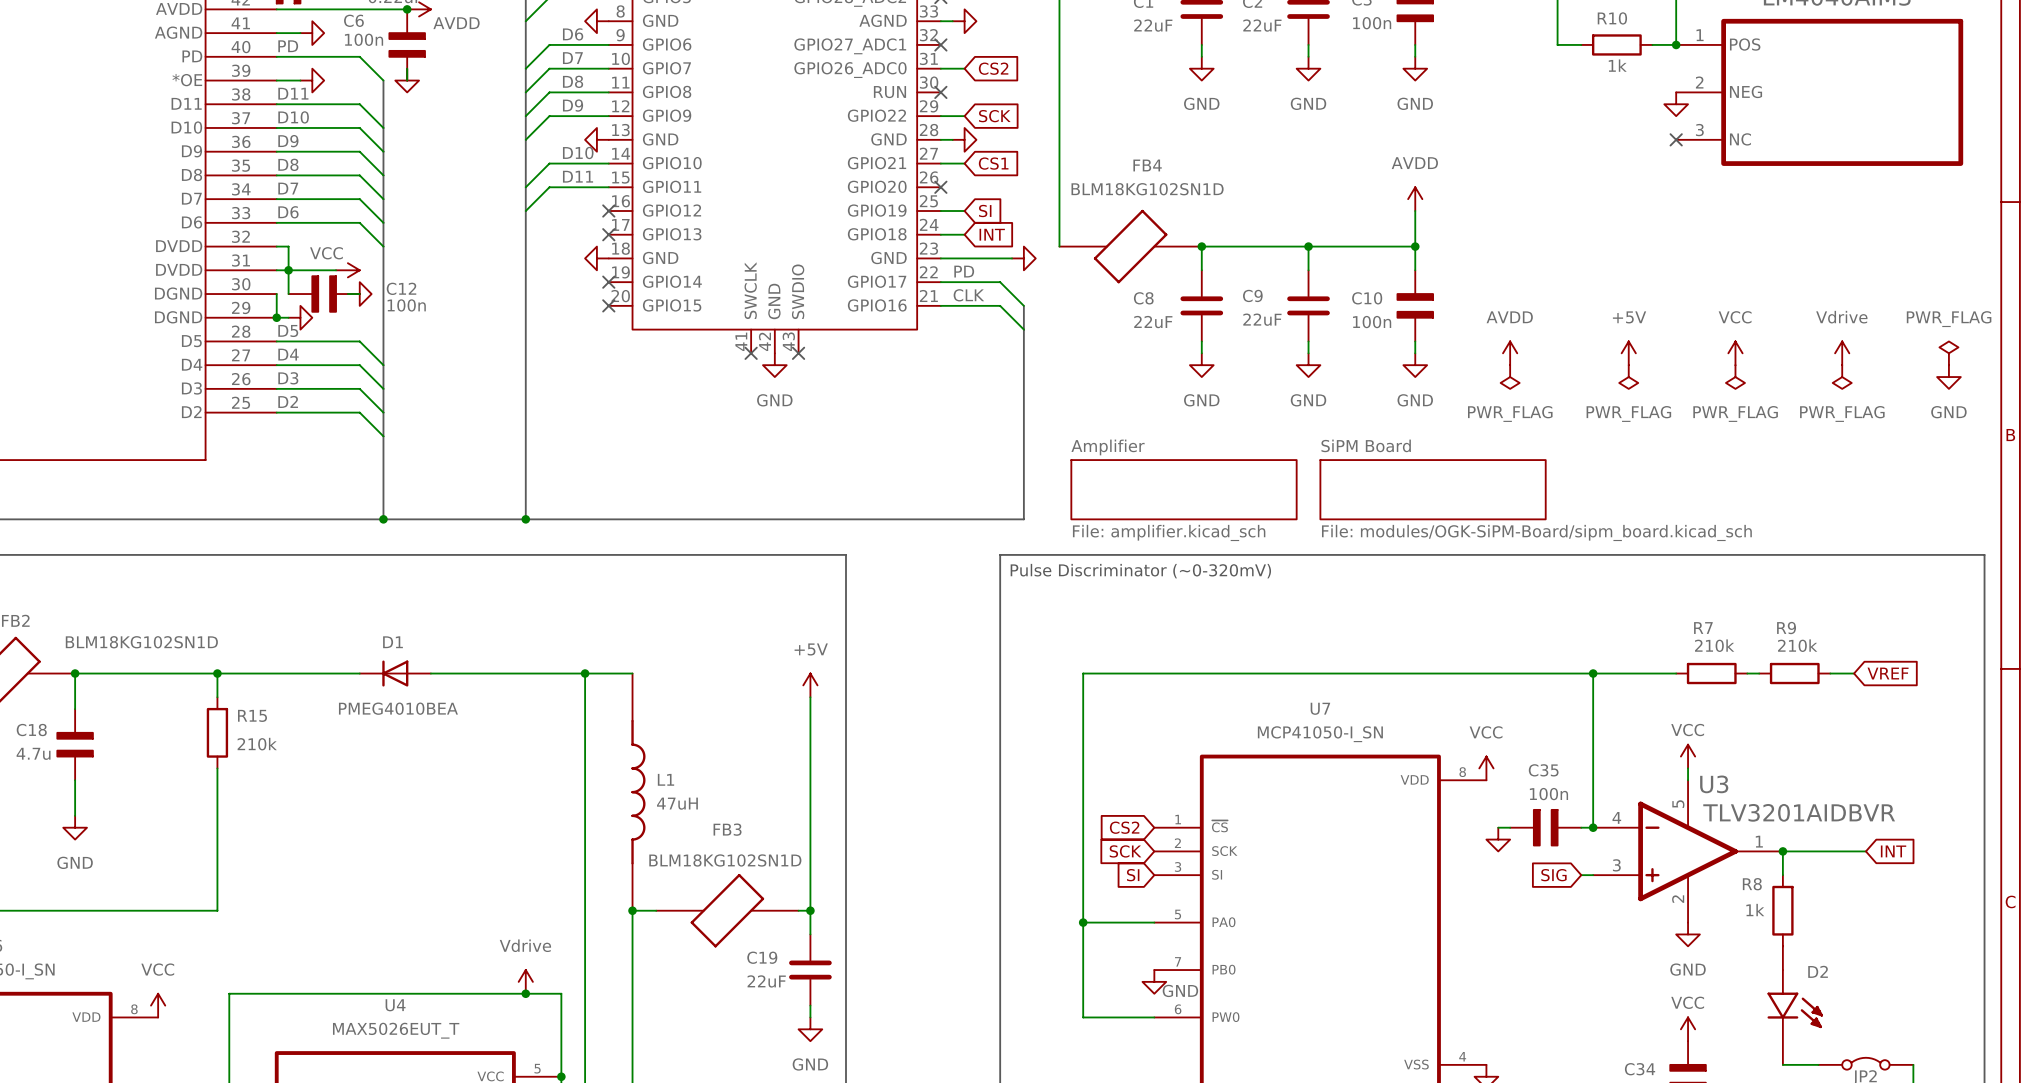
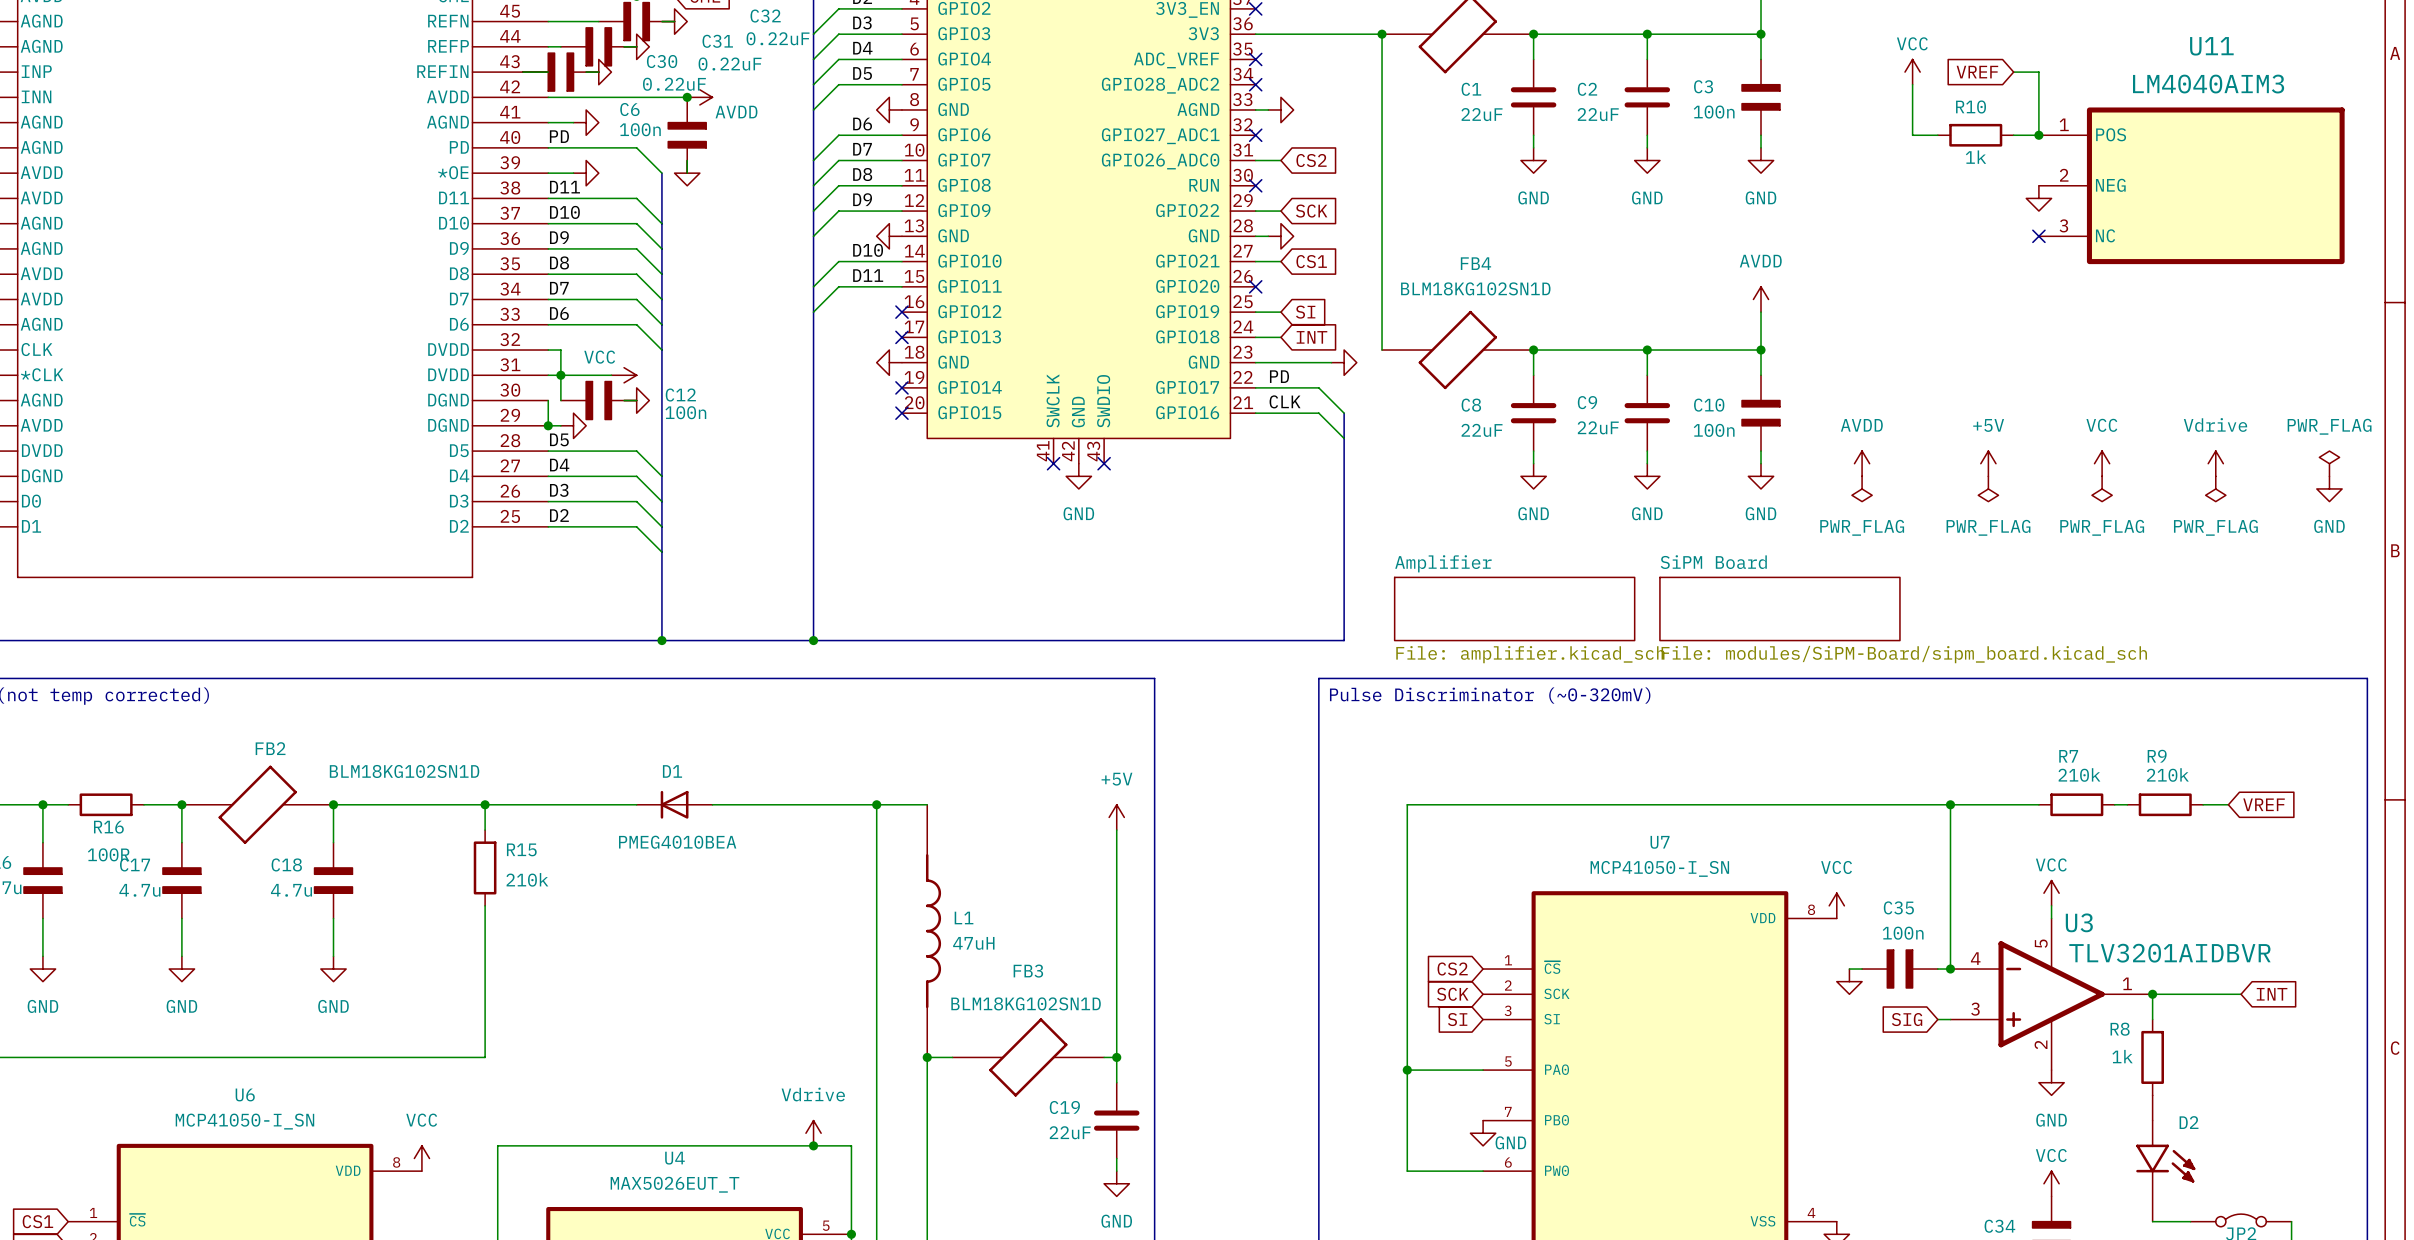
sheet SiPM Board value: File: modules/OGK-SiPM-Board/sipm_board.kicad_sch (1536, 532) -> File: modules/SiPM-Board/sipm_board.kicad_sch (1904, 654)

